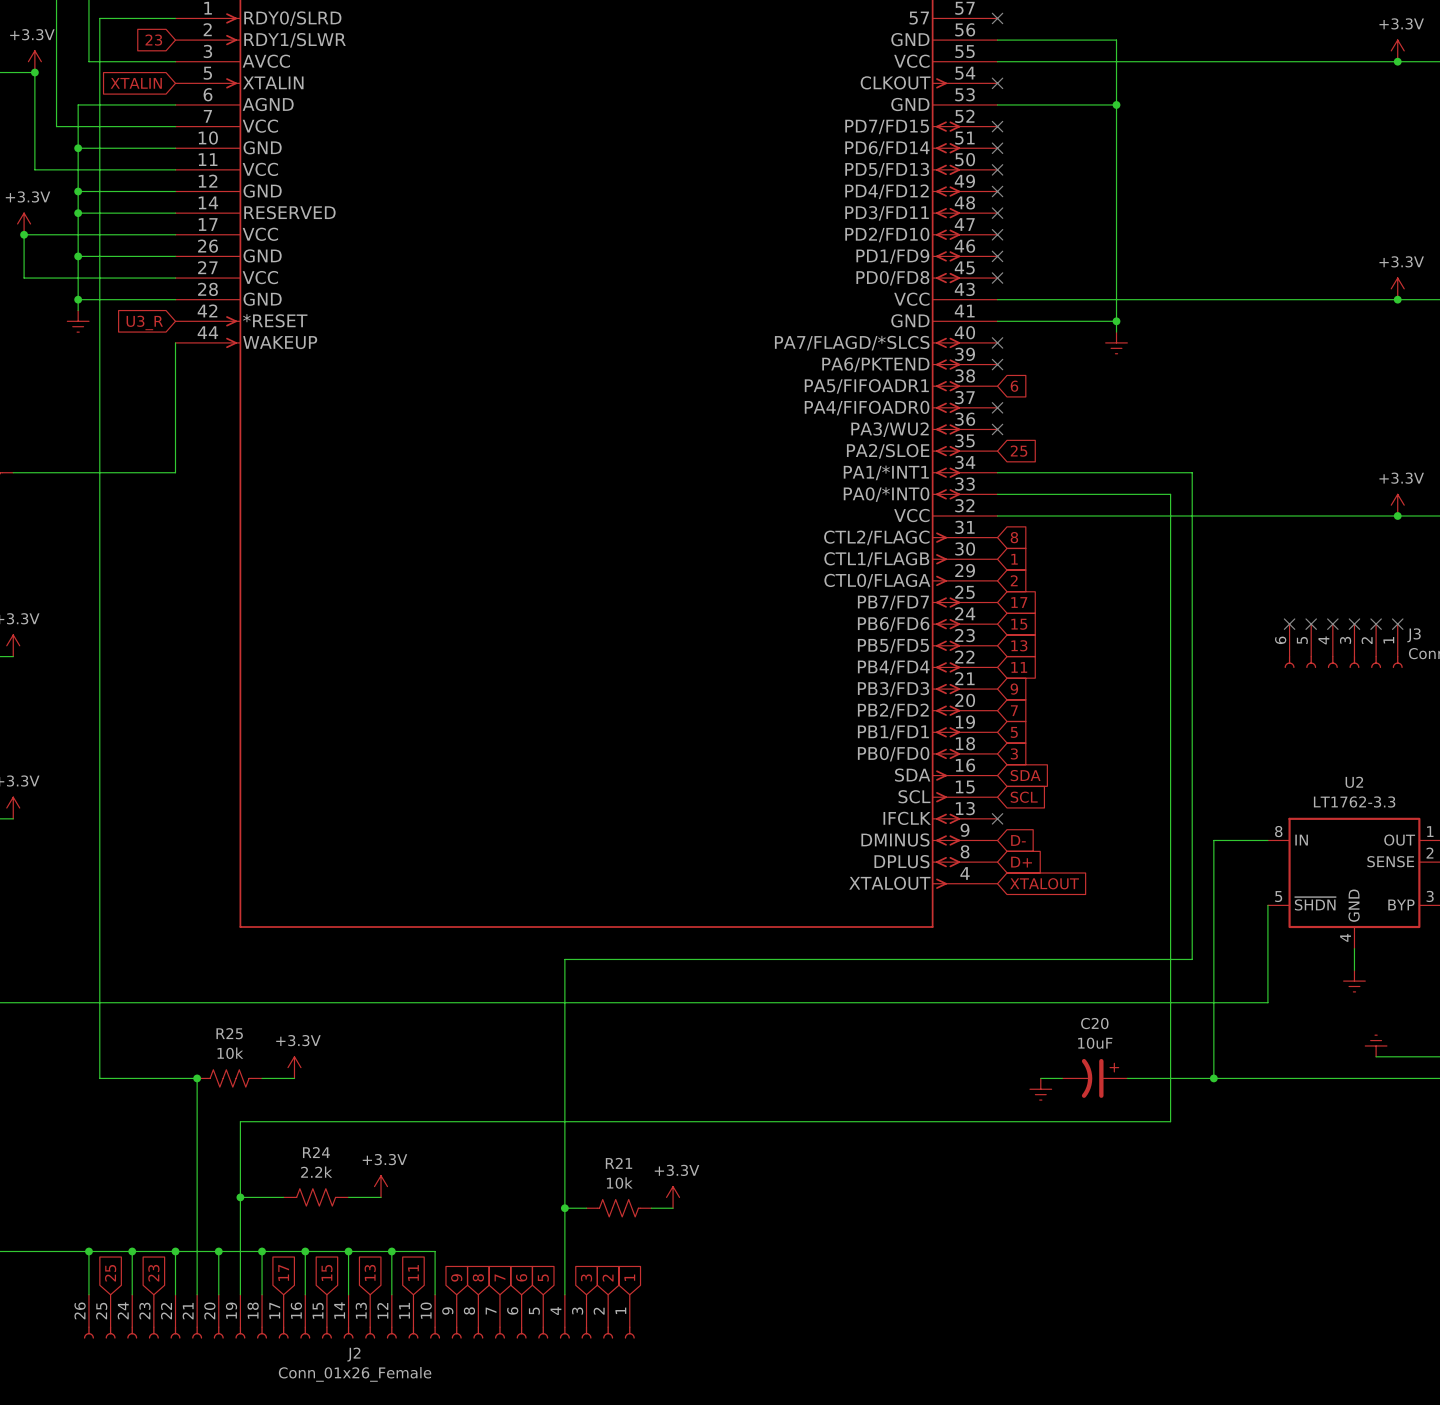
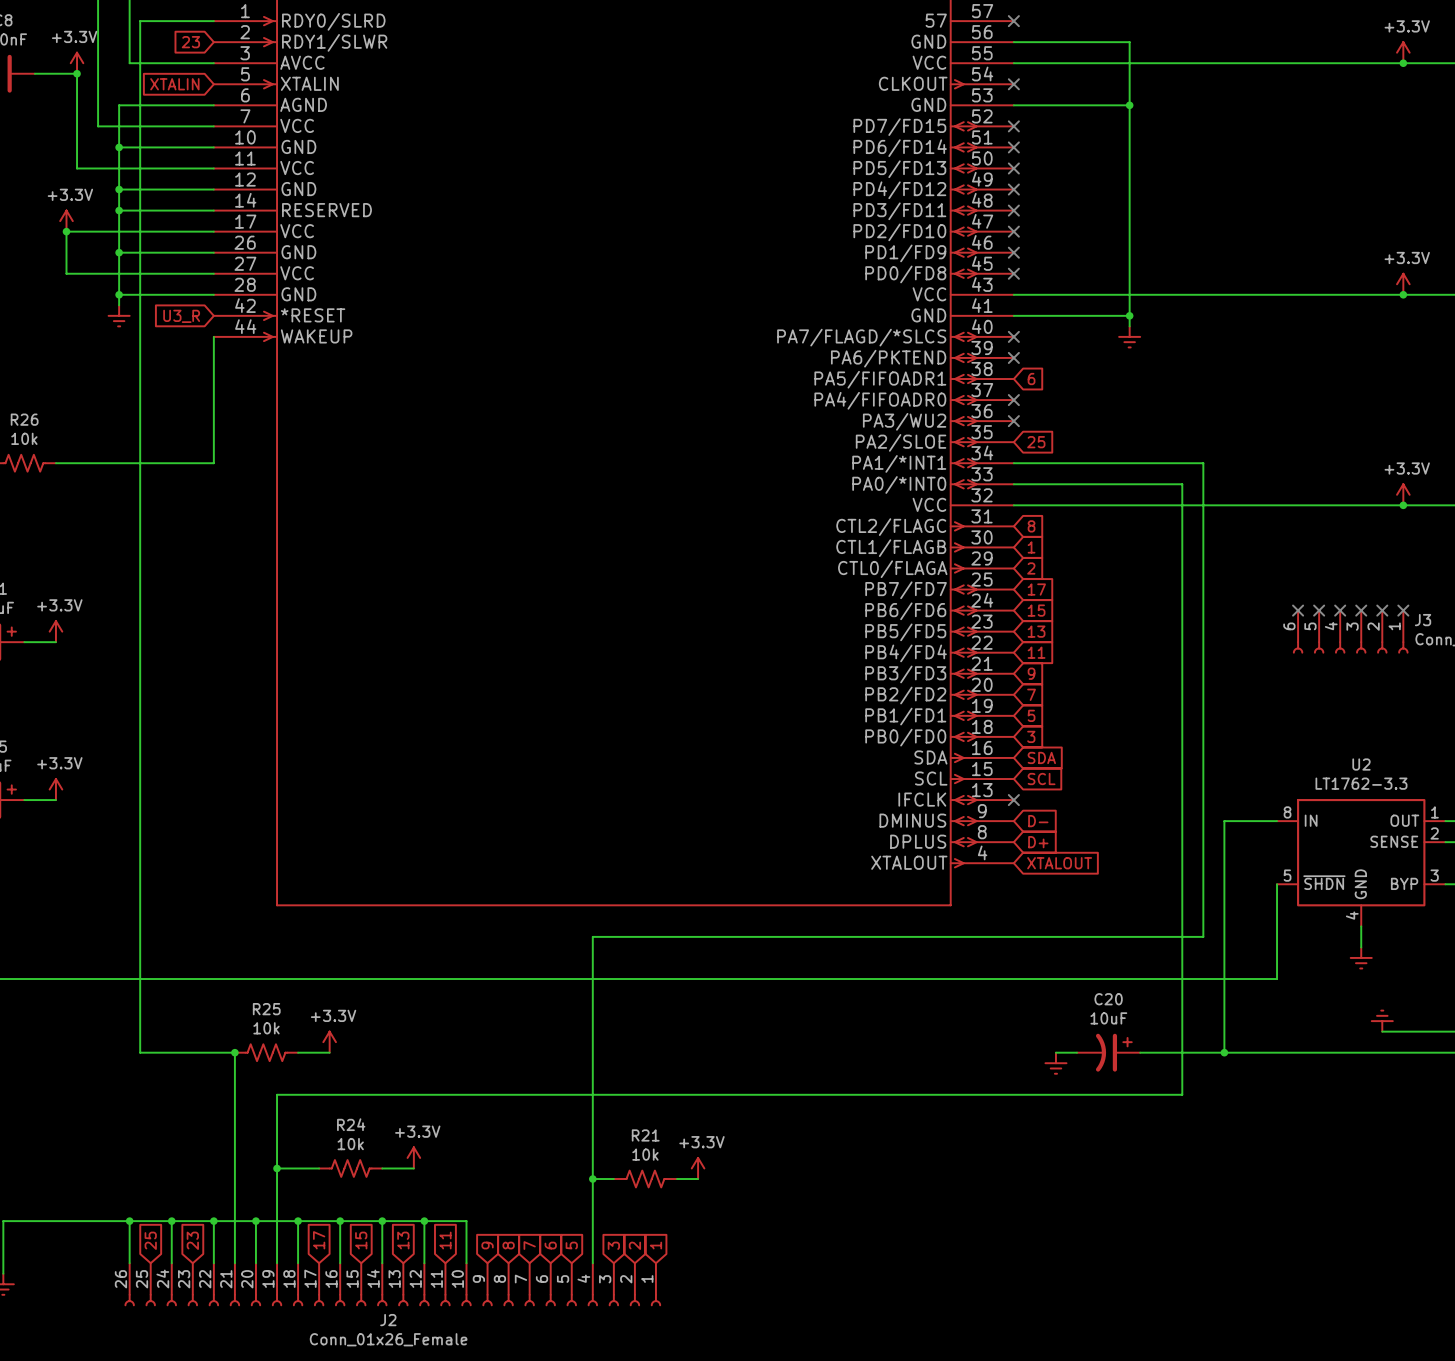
R24 value: 2.2k (316, 1172) -> 10k (350, 1144)

